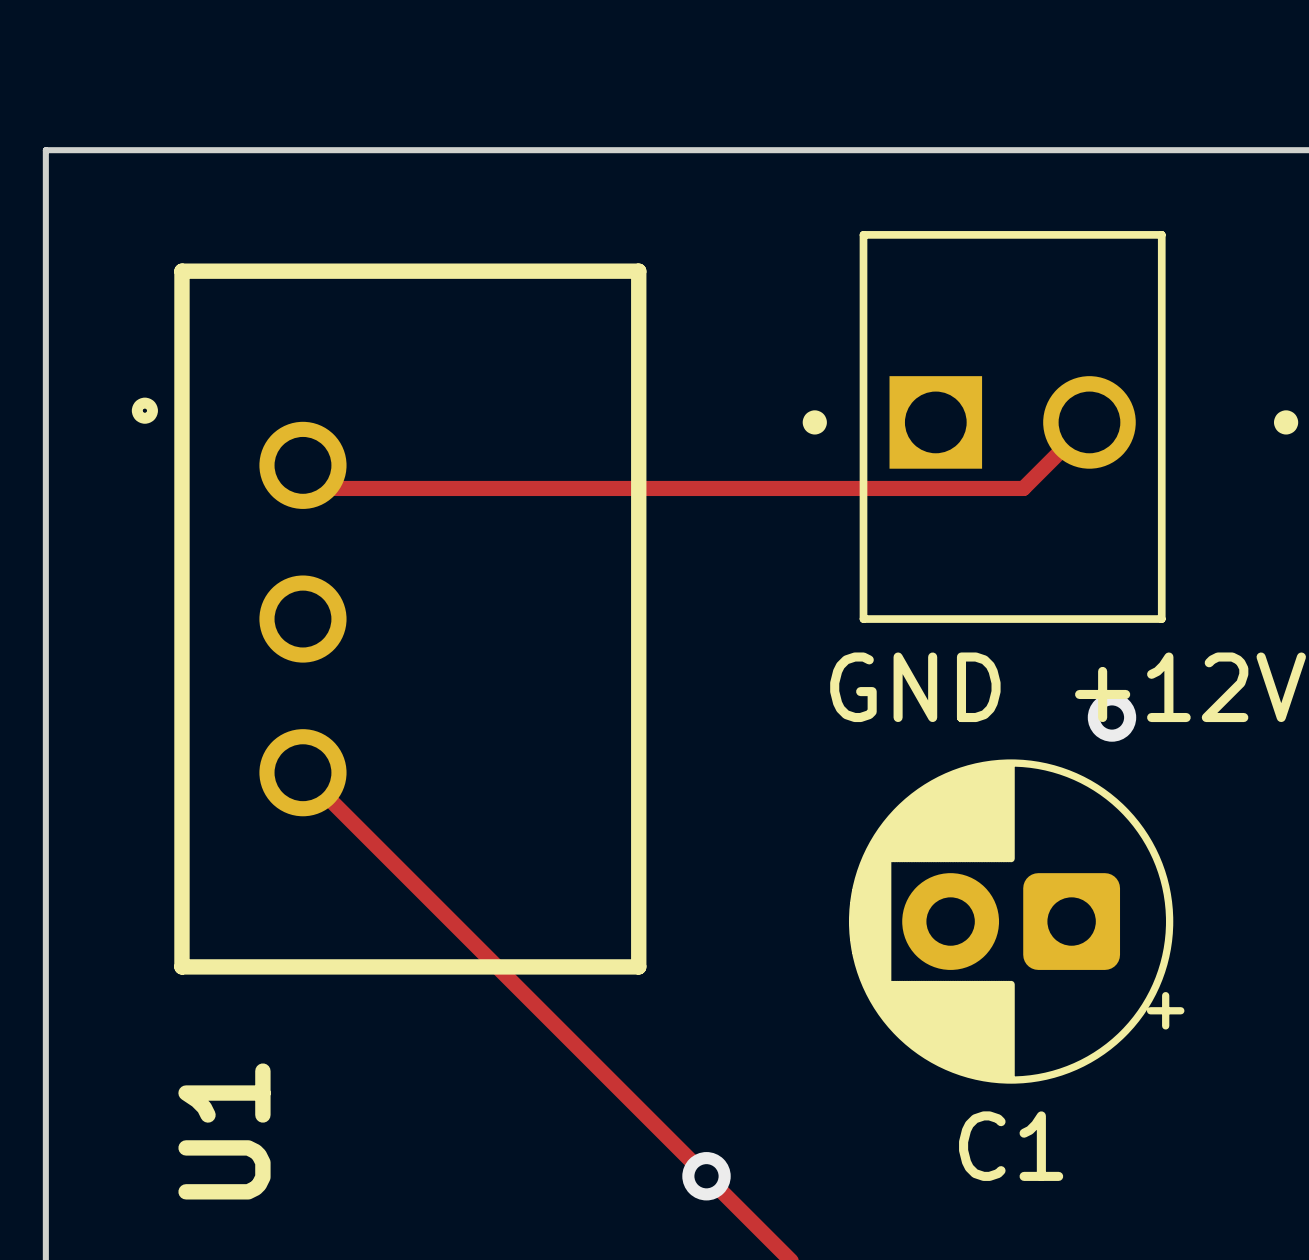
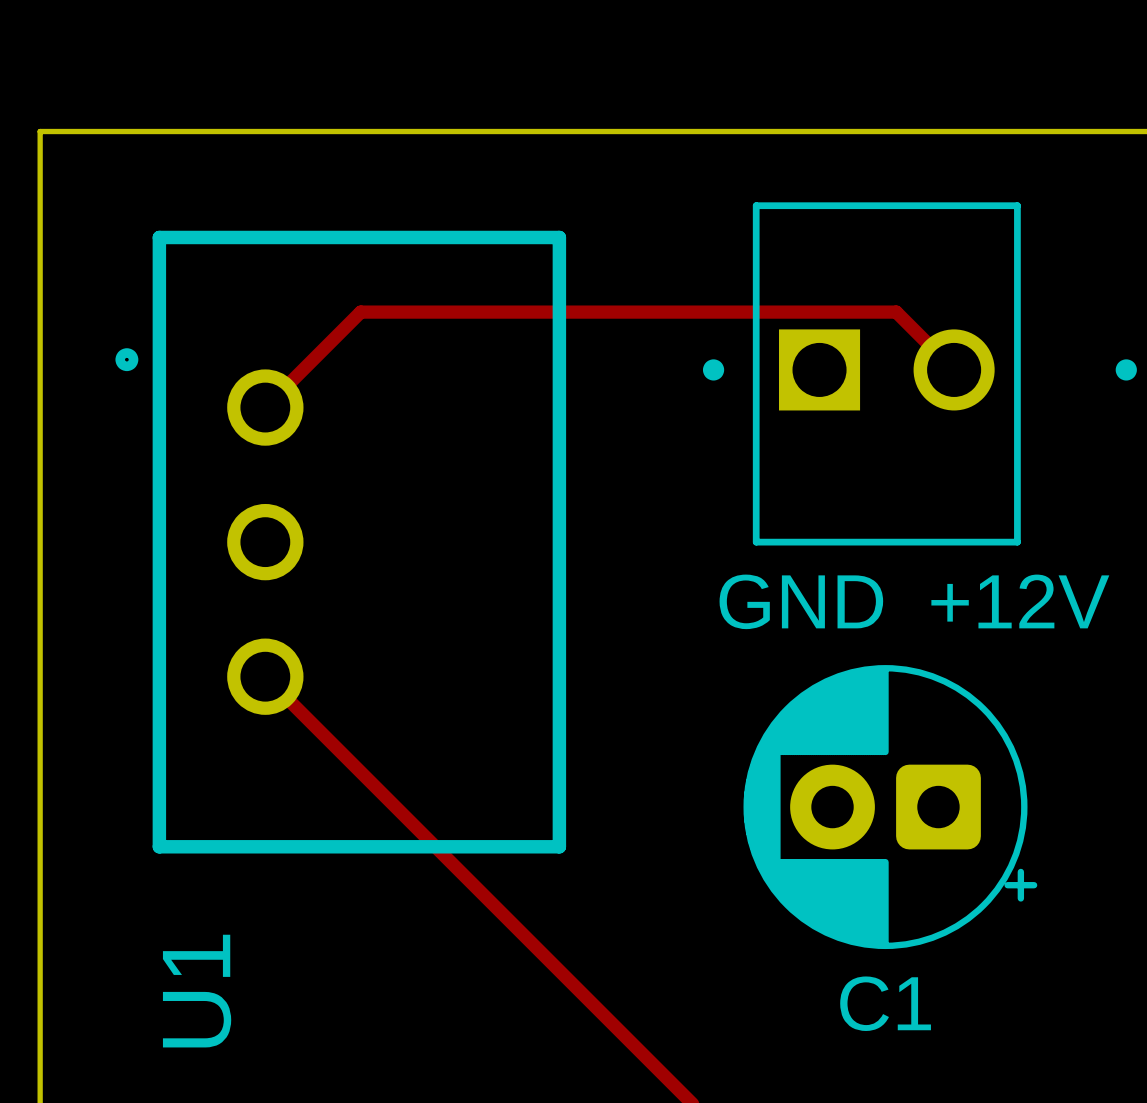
track: (1089, 422) (1023, 488) (326, 488) (302, 465) -> (954, 369) (896, 312) (360, 312) (265, 407)
via: (1111, 717) -> none
via: (706, 1176) -> none

